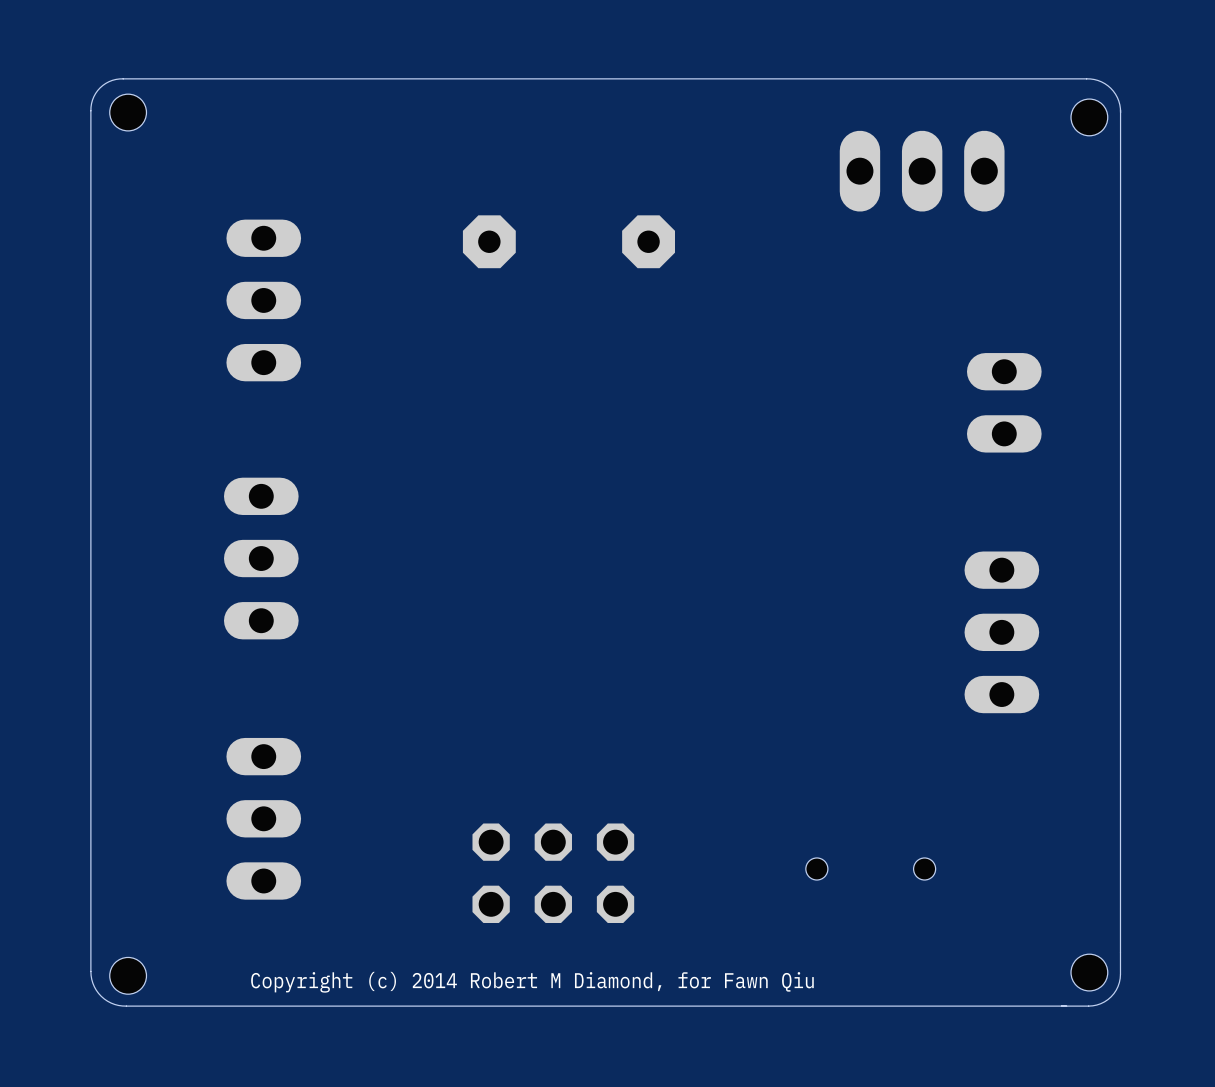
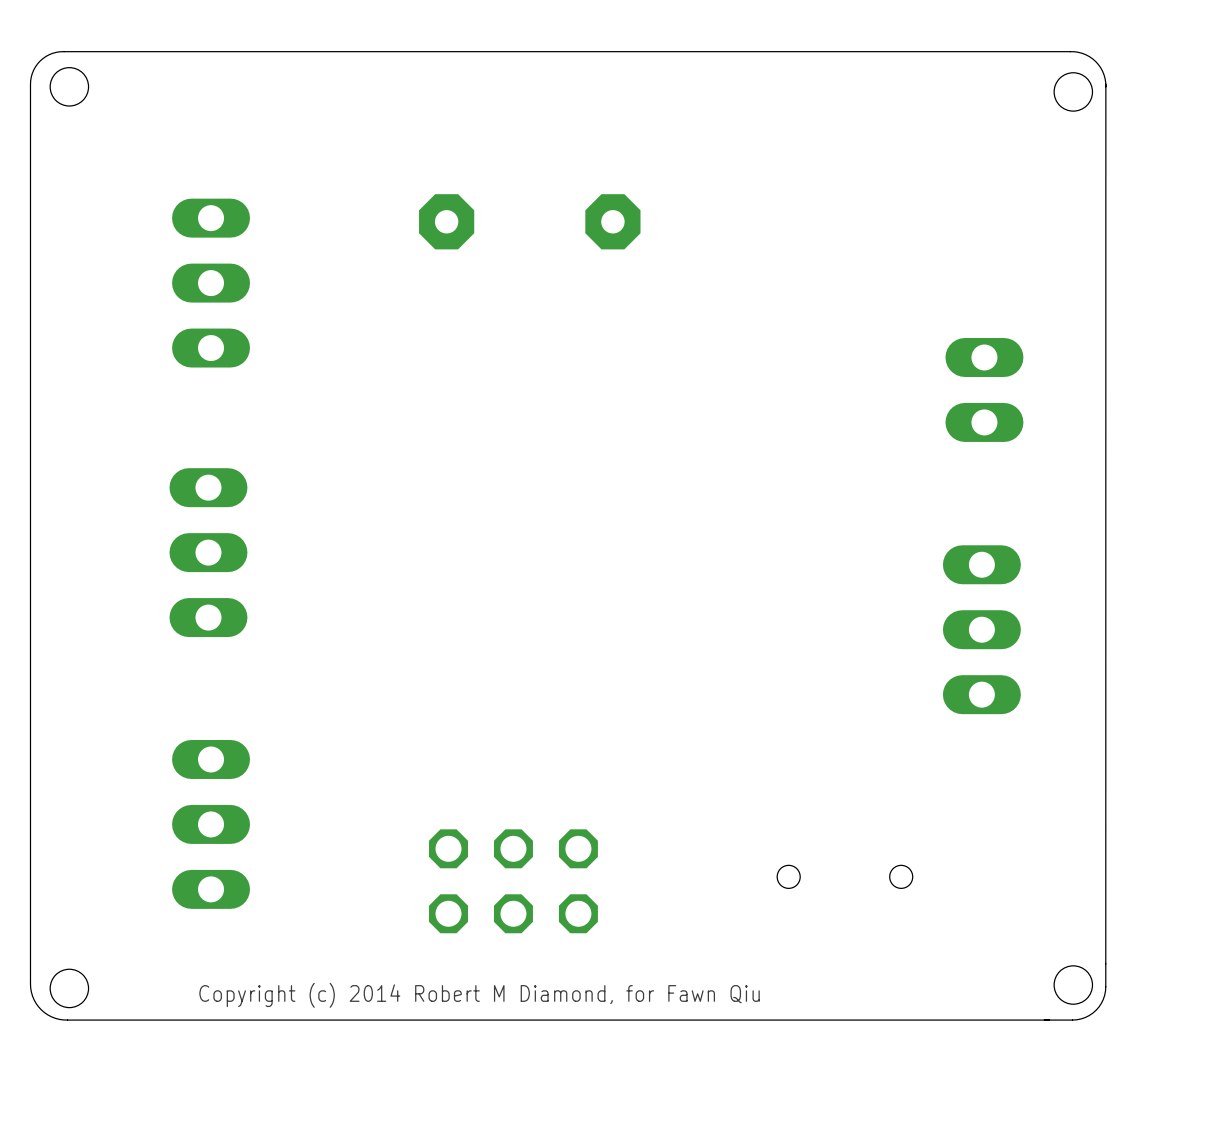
part: (922, 171) -> none

